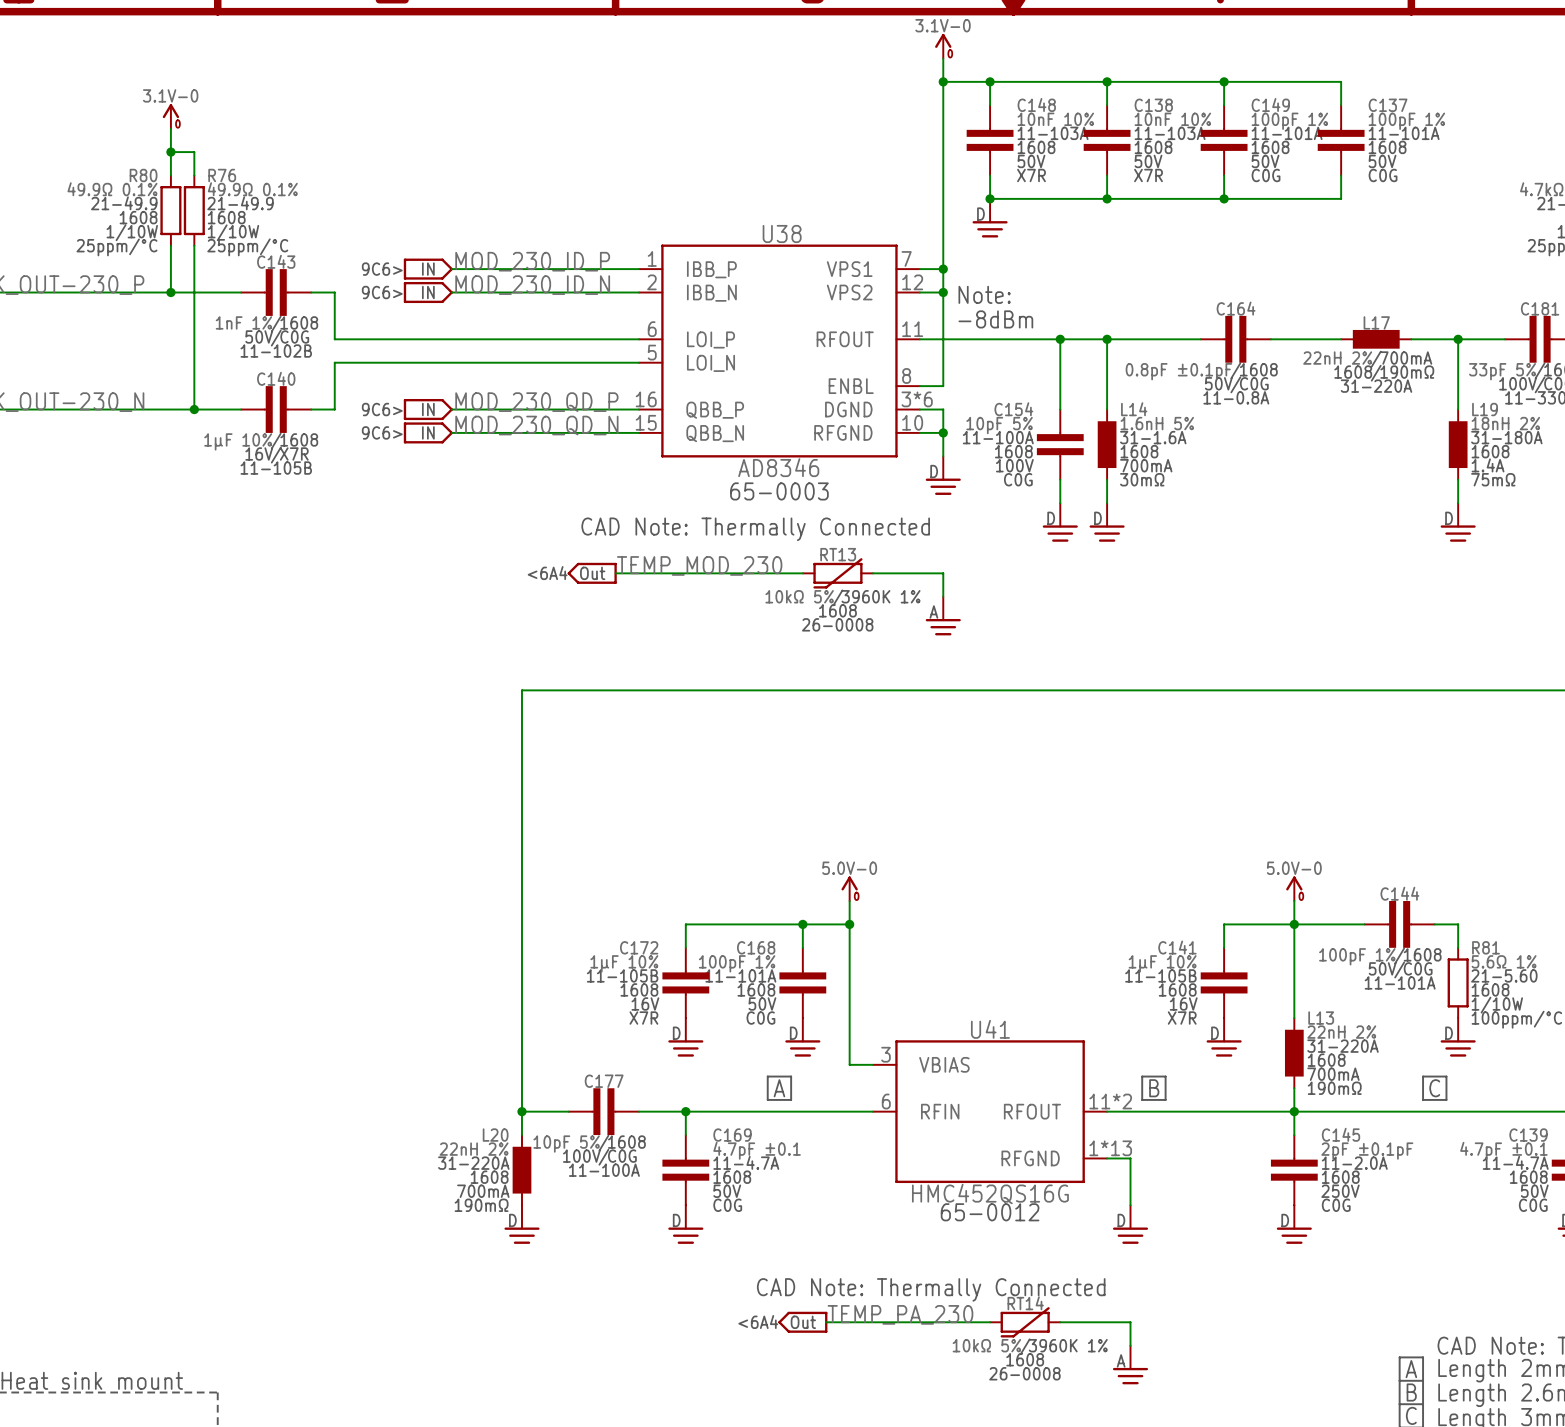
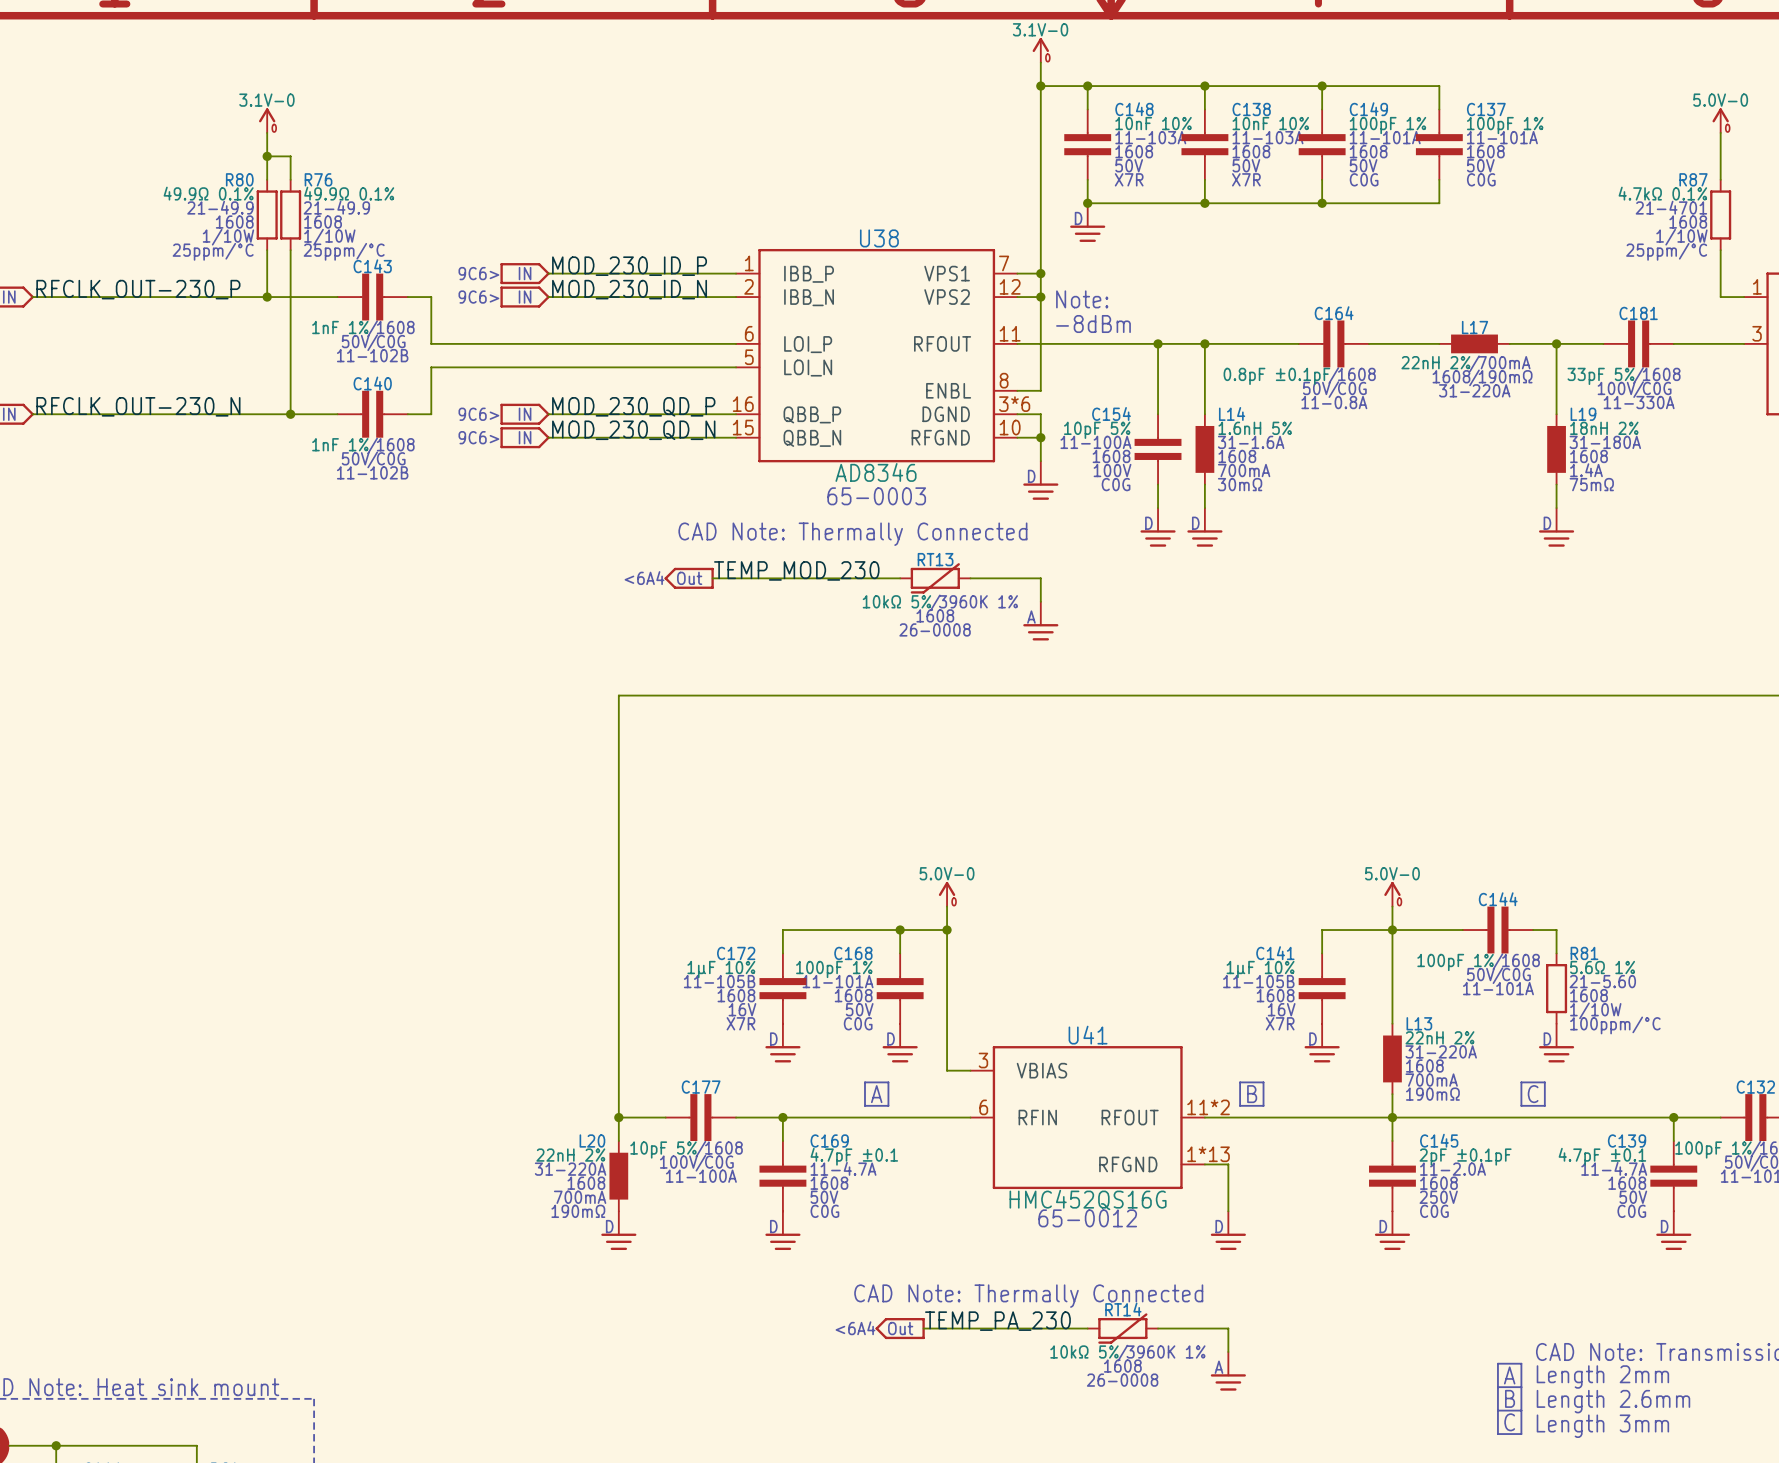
C140 value: 1µF 10% (238, 441) -> 1nF 1% (340, 444)
C140 text: 16V (259, 453) -> 50V (355, 458)
C140 text: X7R (294, 453) -> C0G (391, 458)
C140 text: 11-105B (276, 468) -> 11-102B (372, 472)

